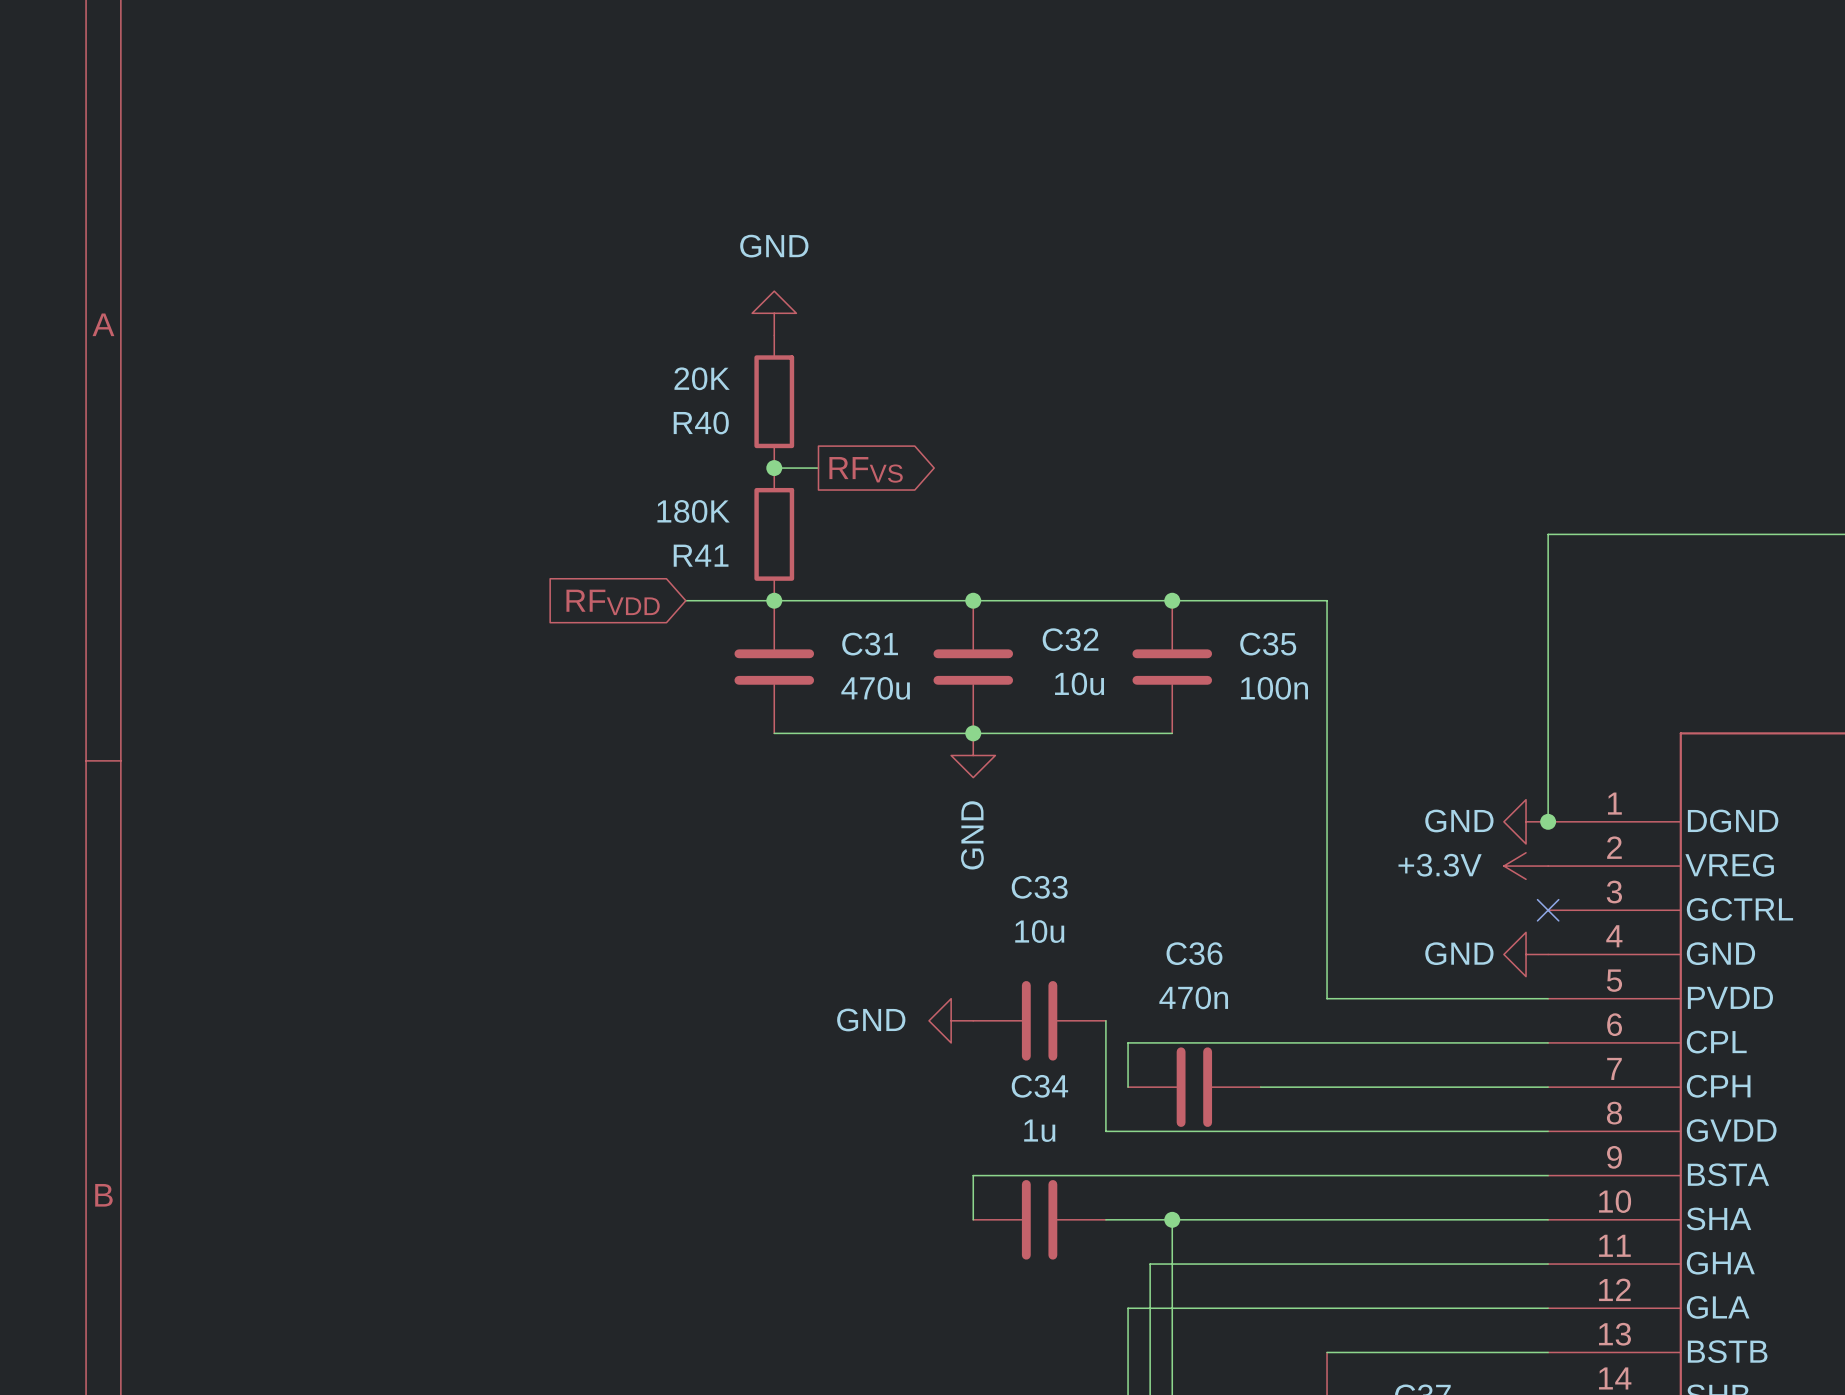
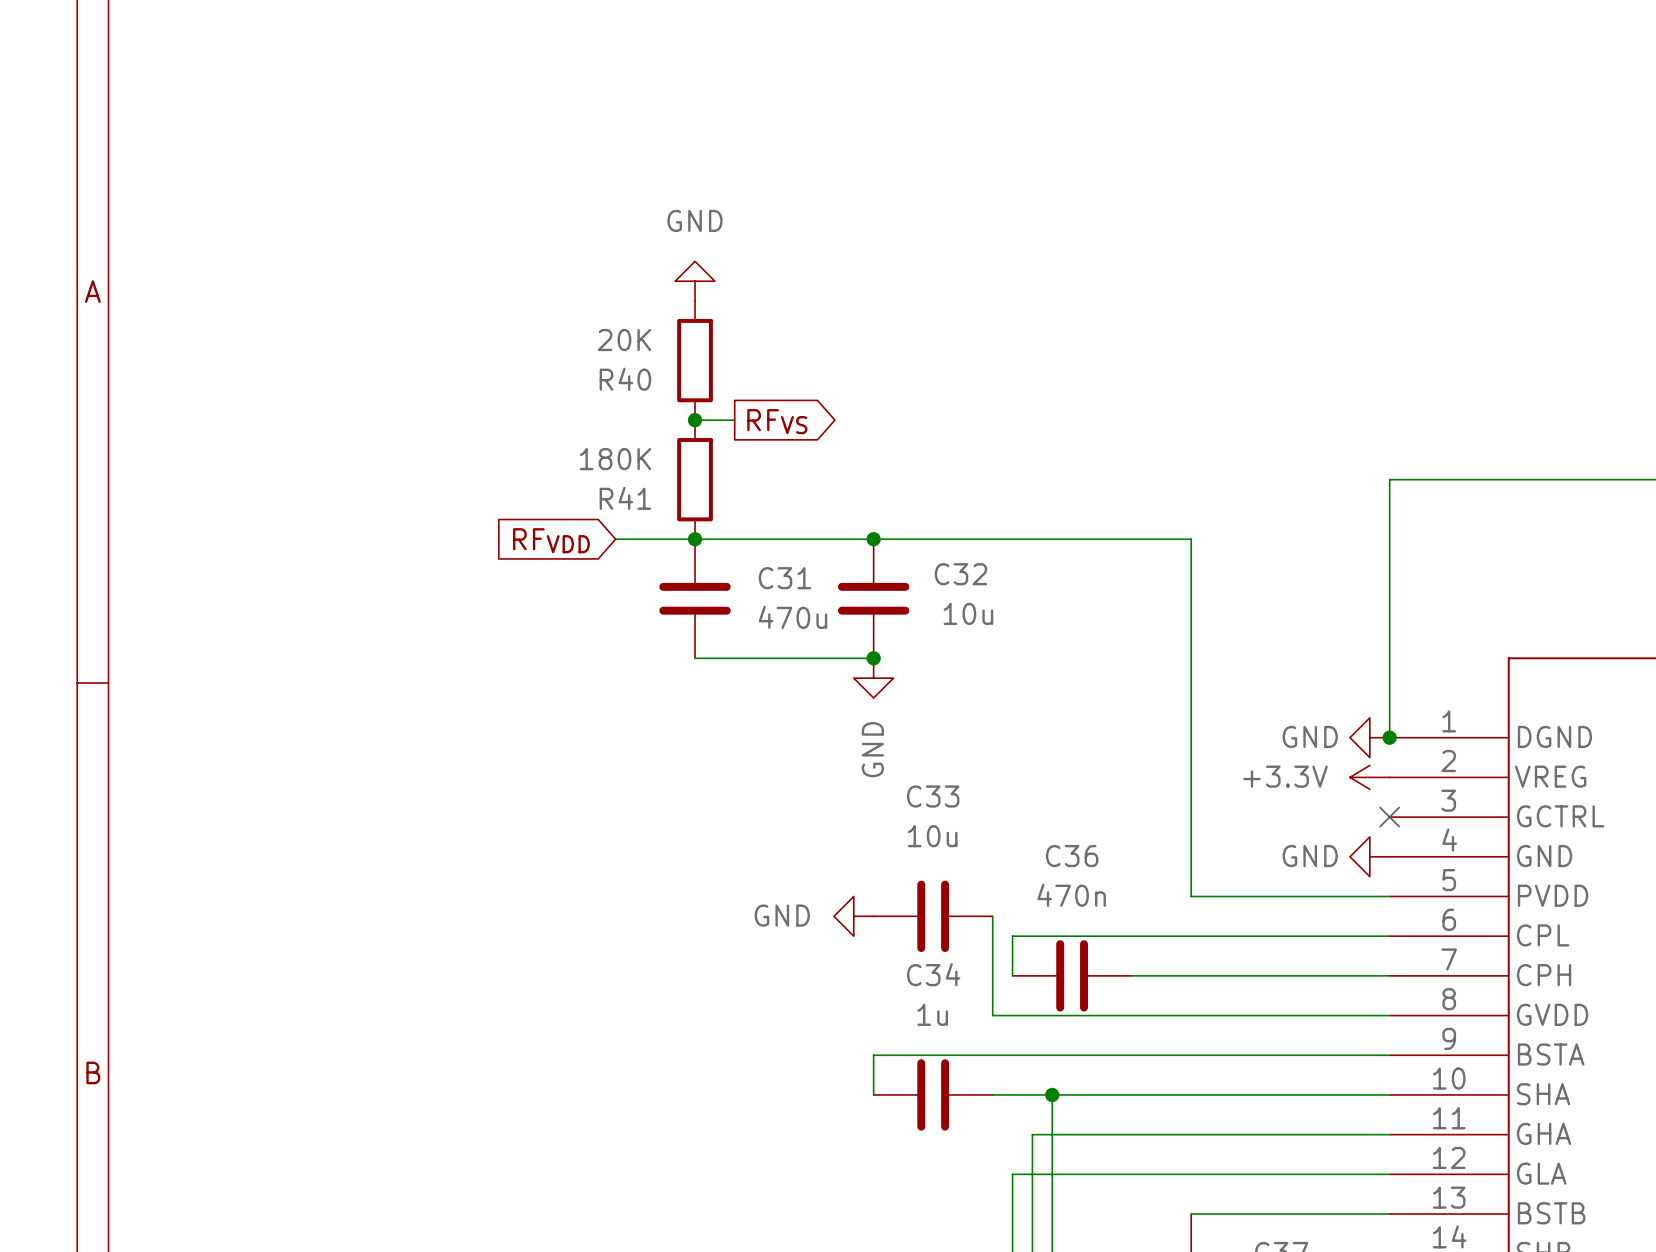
junction: (1172, 600) -> none
C35: 100n (1172, 667) -> none
wire: (973, 733) (1172, 733) -> none

